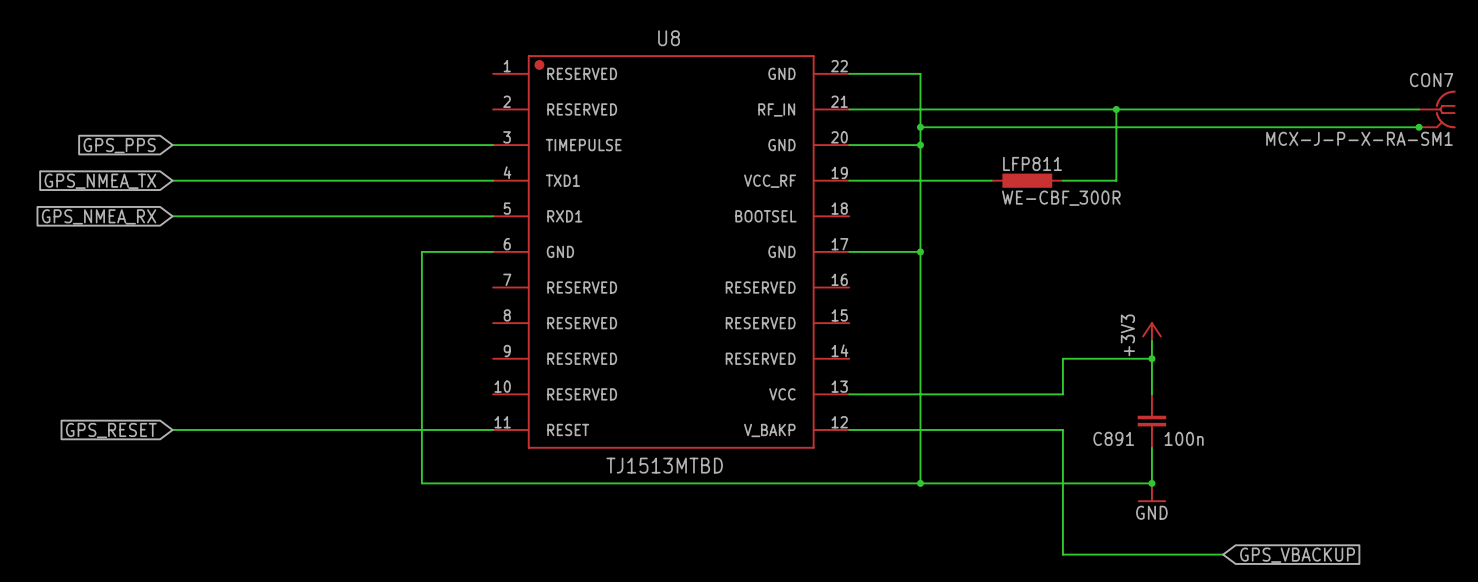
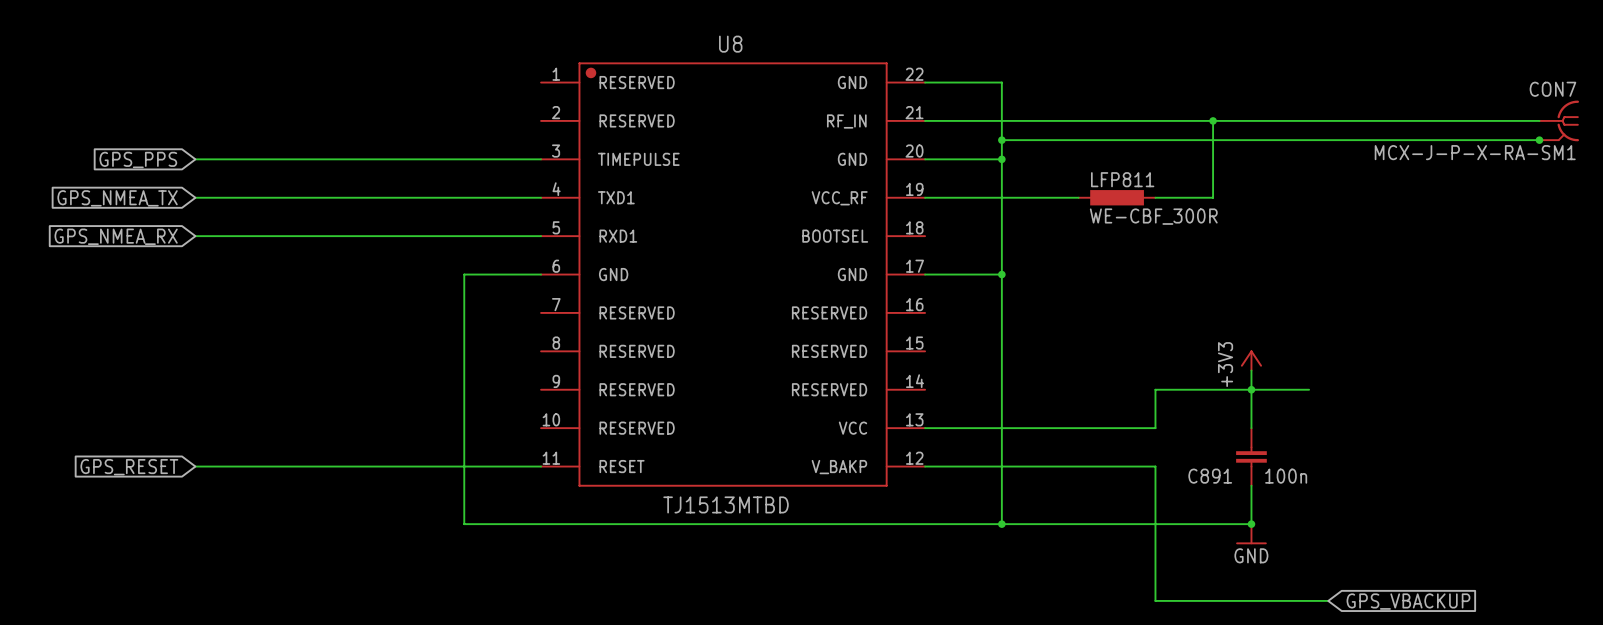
wire: none -> (1251, 389) (1309, 389)

